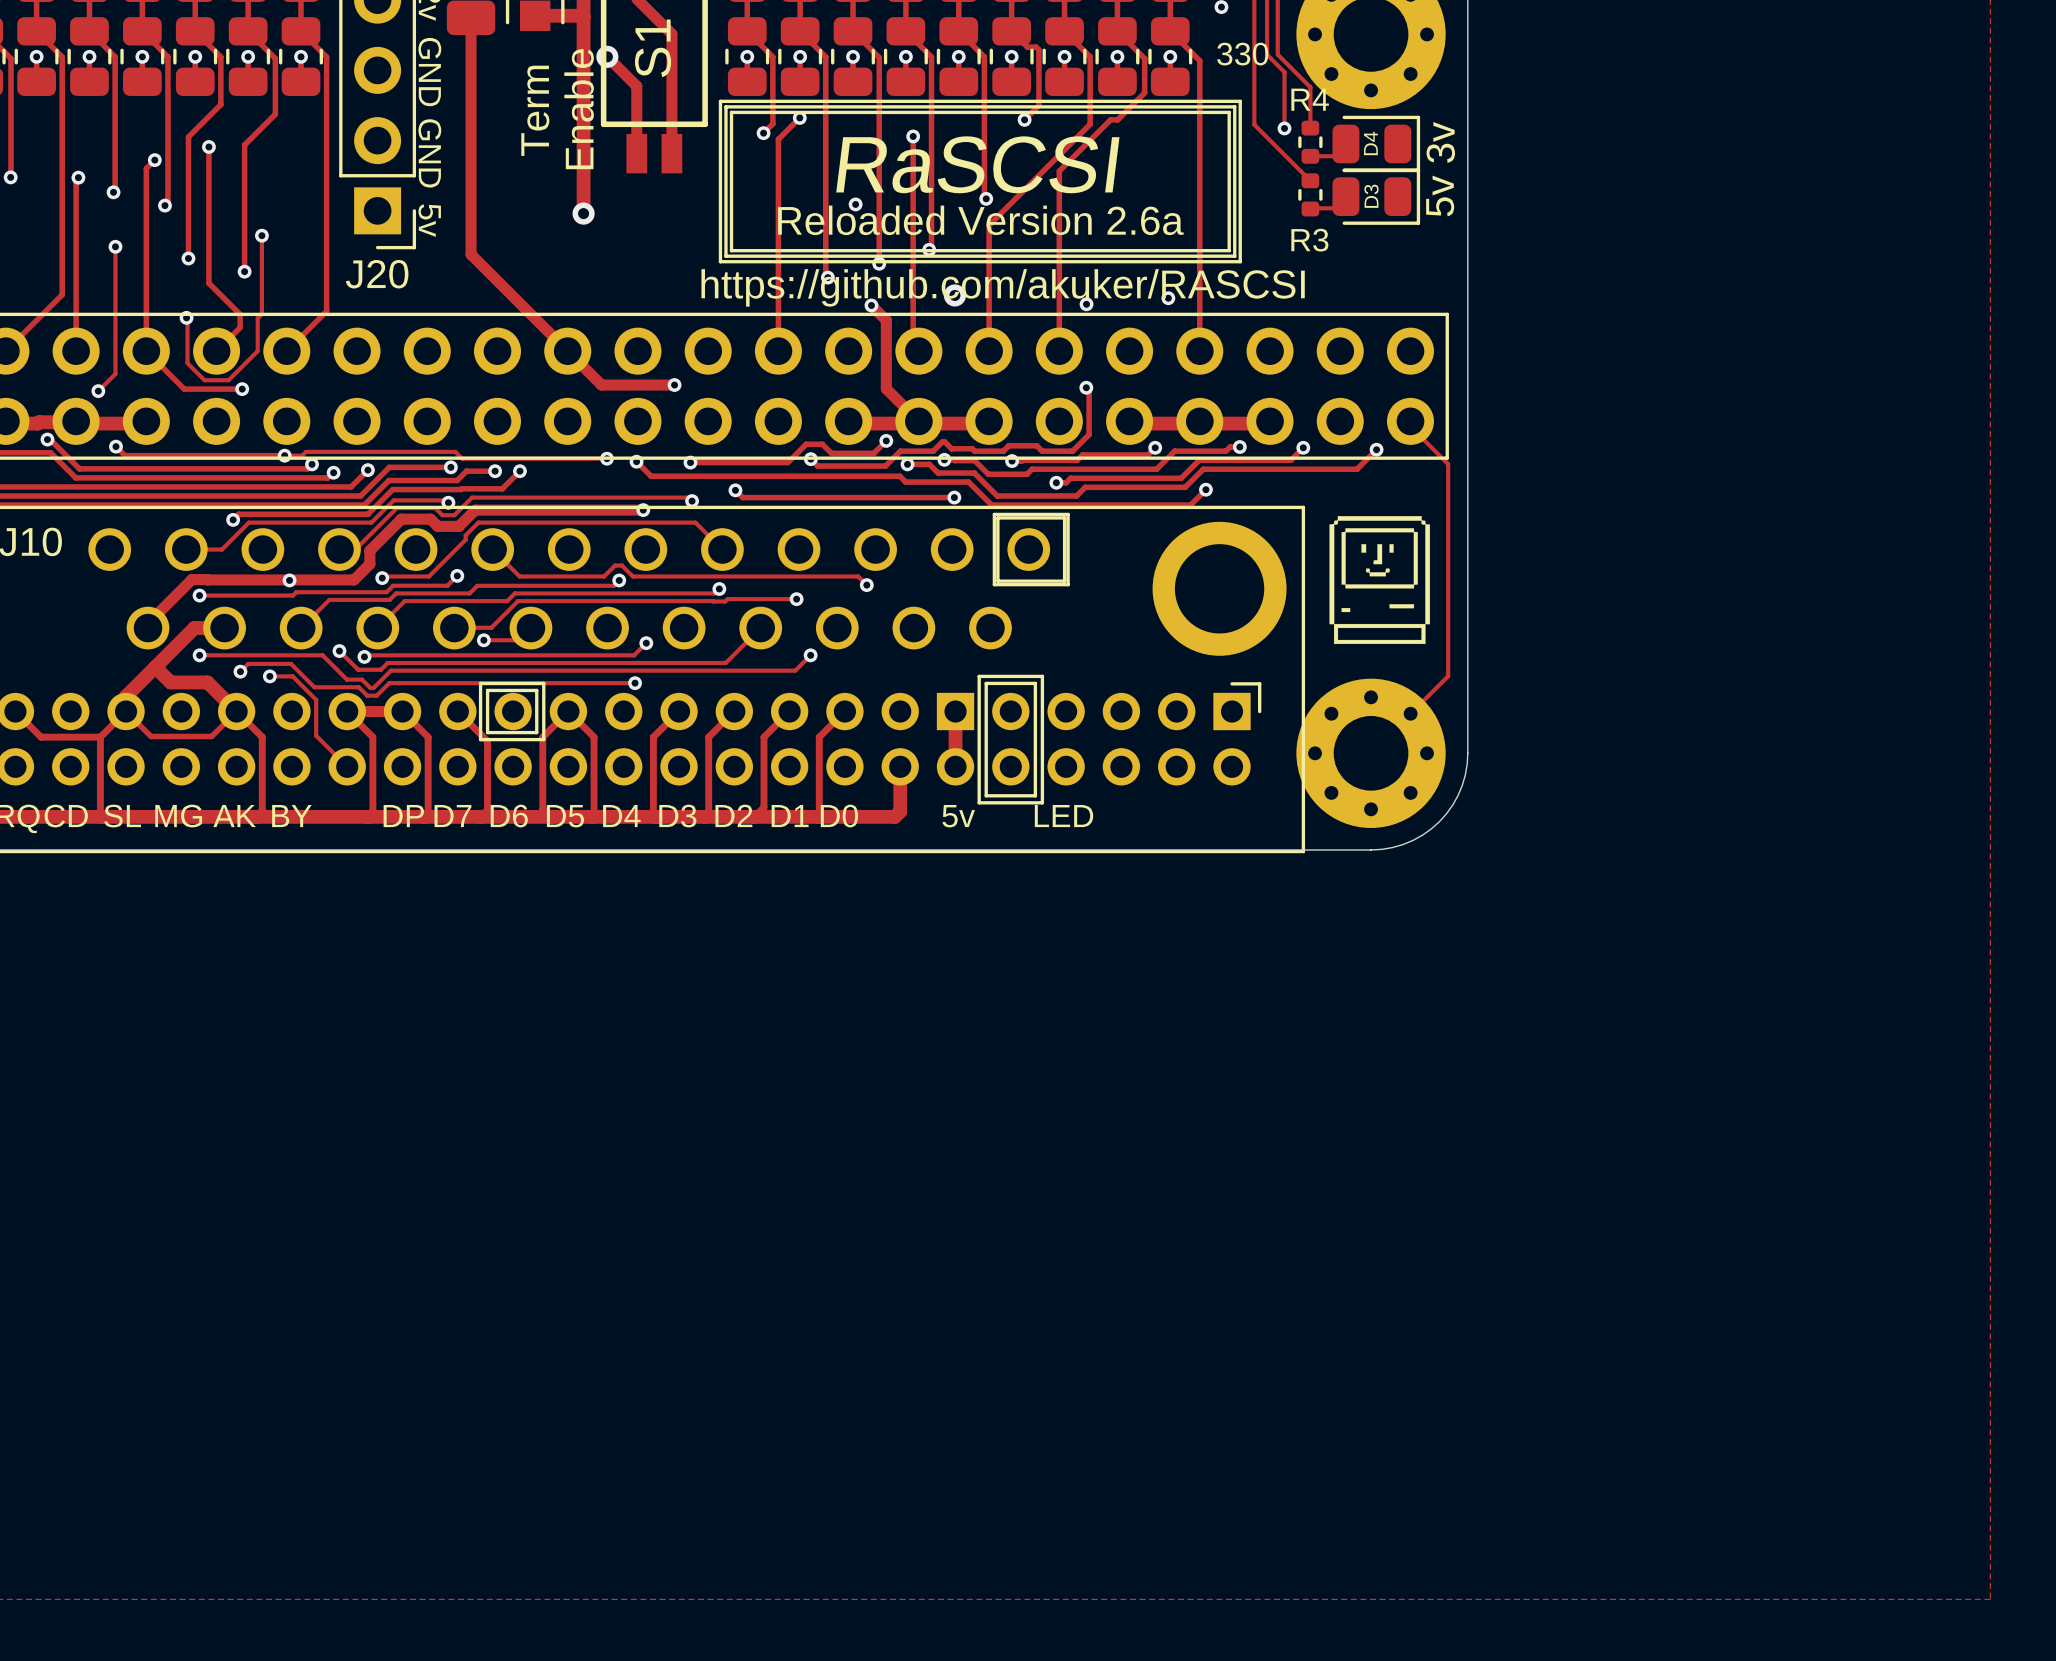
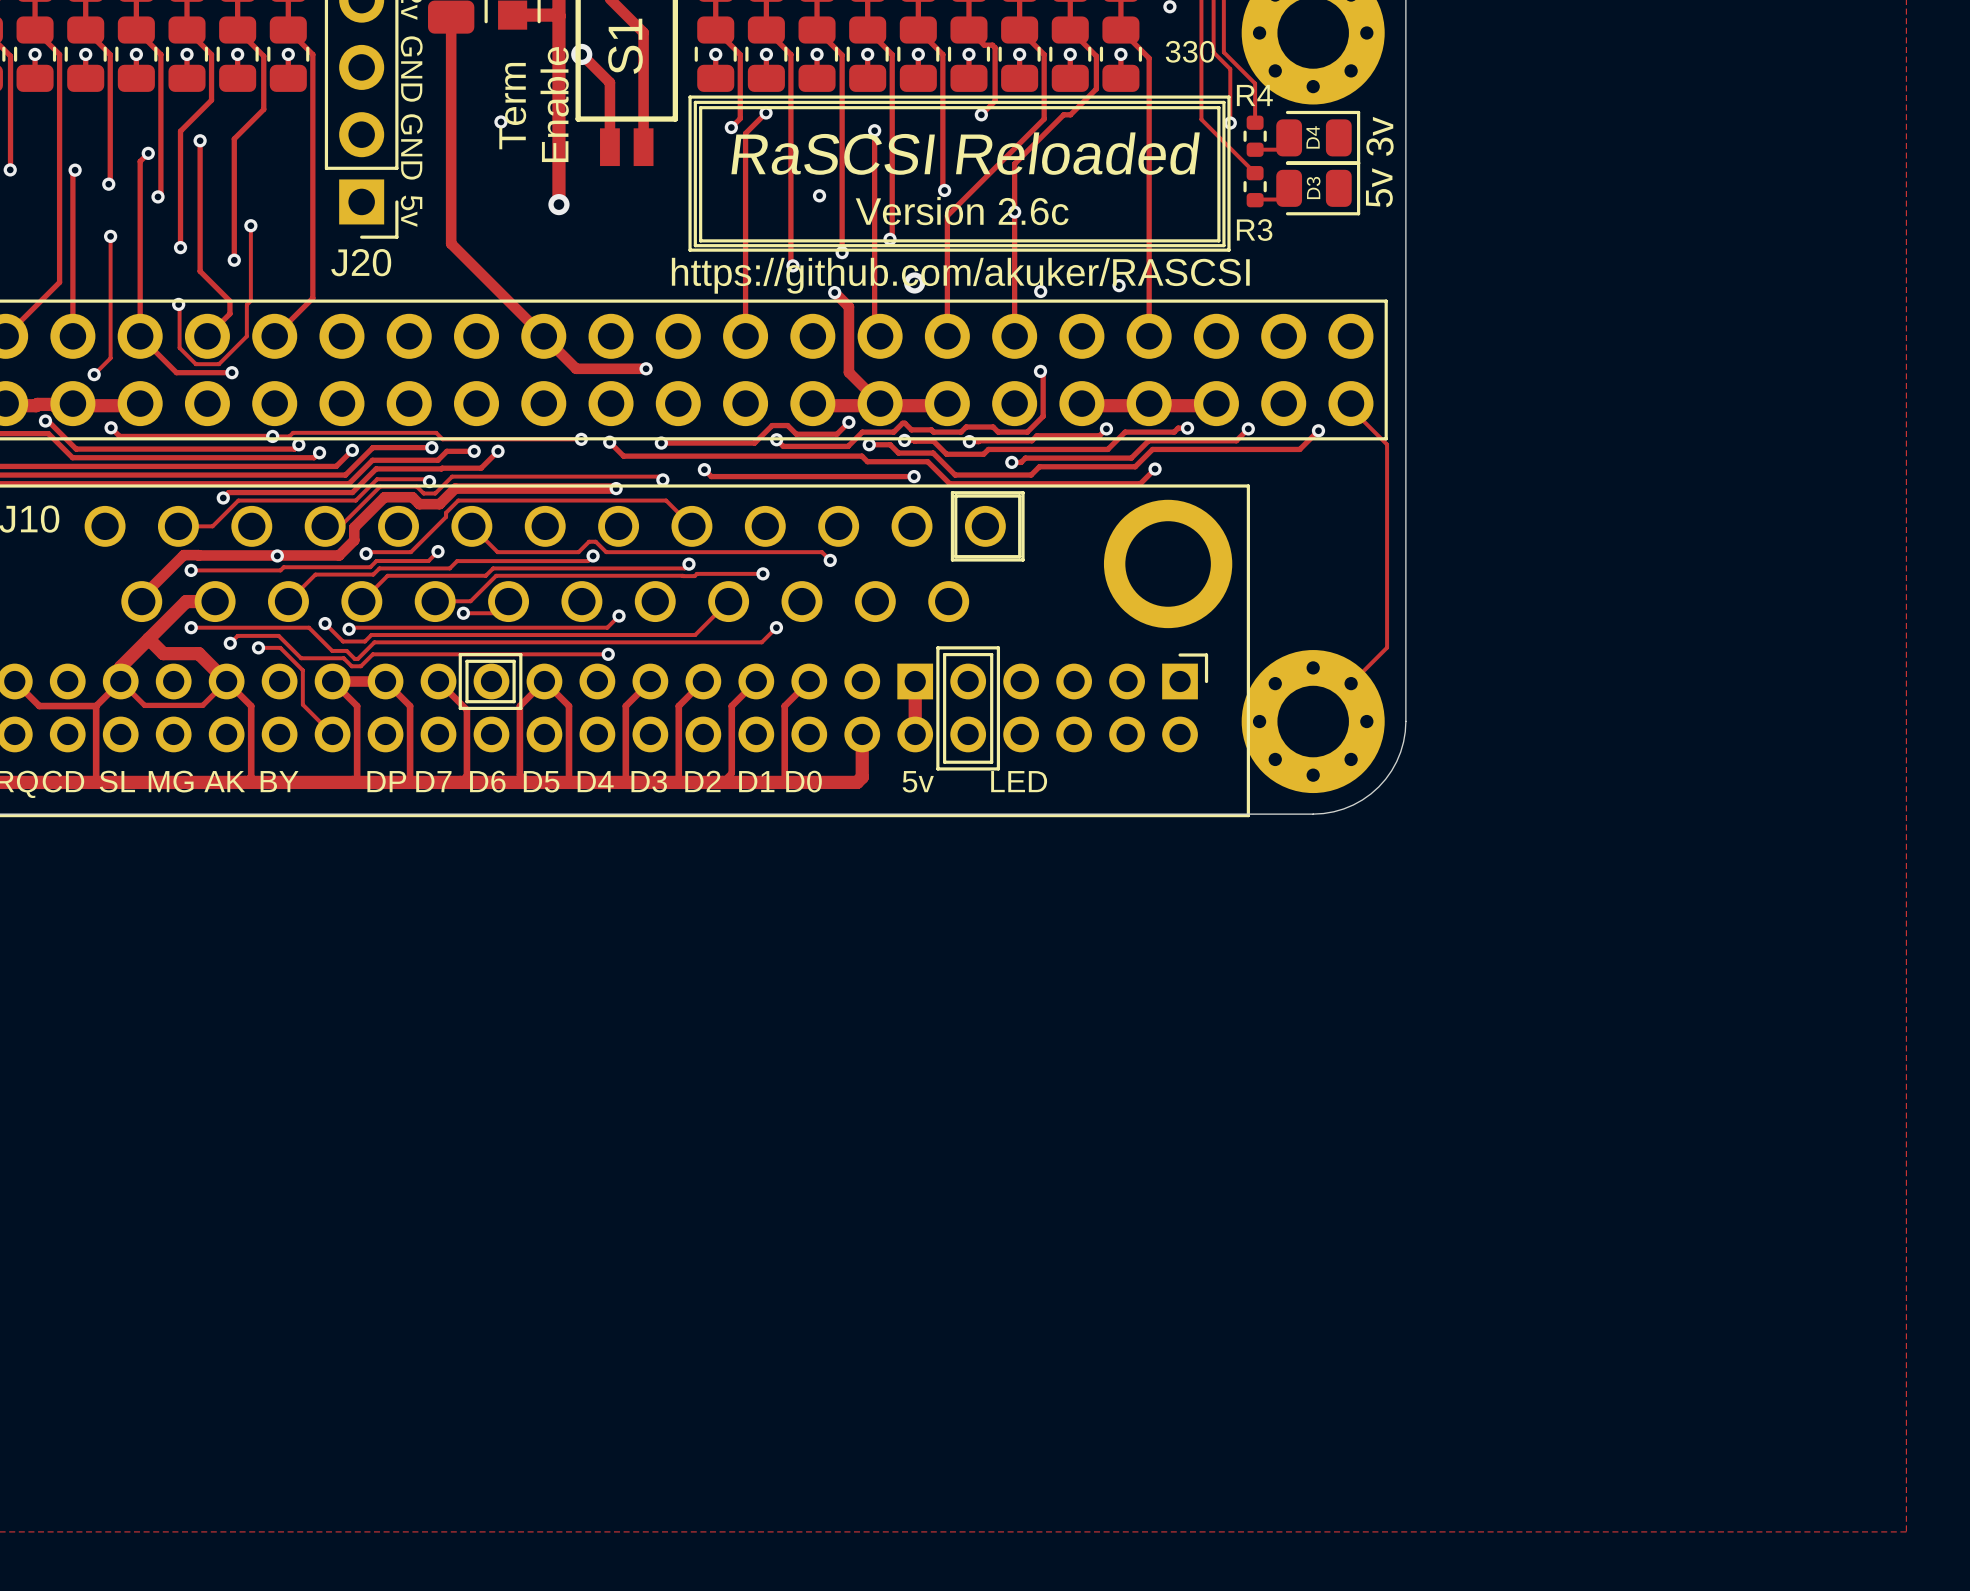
line: (1240, 101) (1240, 261) (720, 261) -> (1187, 97) (1228, 97) (1228, 250) (690, 250)
line: (1234, 106) (1234, 256) (725, 256) -> (1182, 102) (1223, 102) (1223, 245) (695, 245)
line: (1229, 112) (1229, 250) (731, 250) -> (1177, 107) (1218, 107) (1218, 240) (700, 240)
via: none -> (500, 121)
text: none -> RaSCSI Reloaded (965, 153)
text: RaSCSI (977, 164) -> none
text: Reloaded Version 2.6a (980, 220) -> Version 2.6c (962, 211)
via: none -> (1014, 212)
drawing: [1329, 516, 1431, 645] -> none

